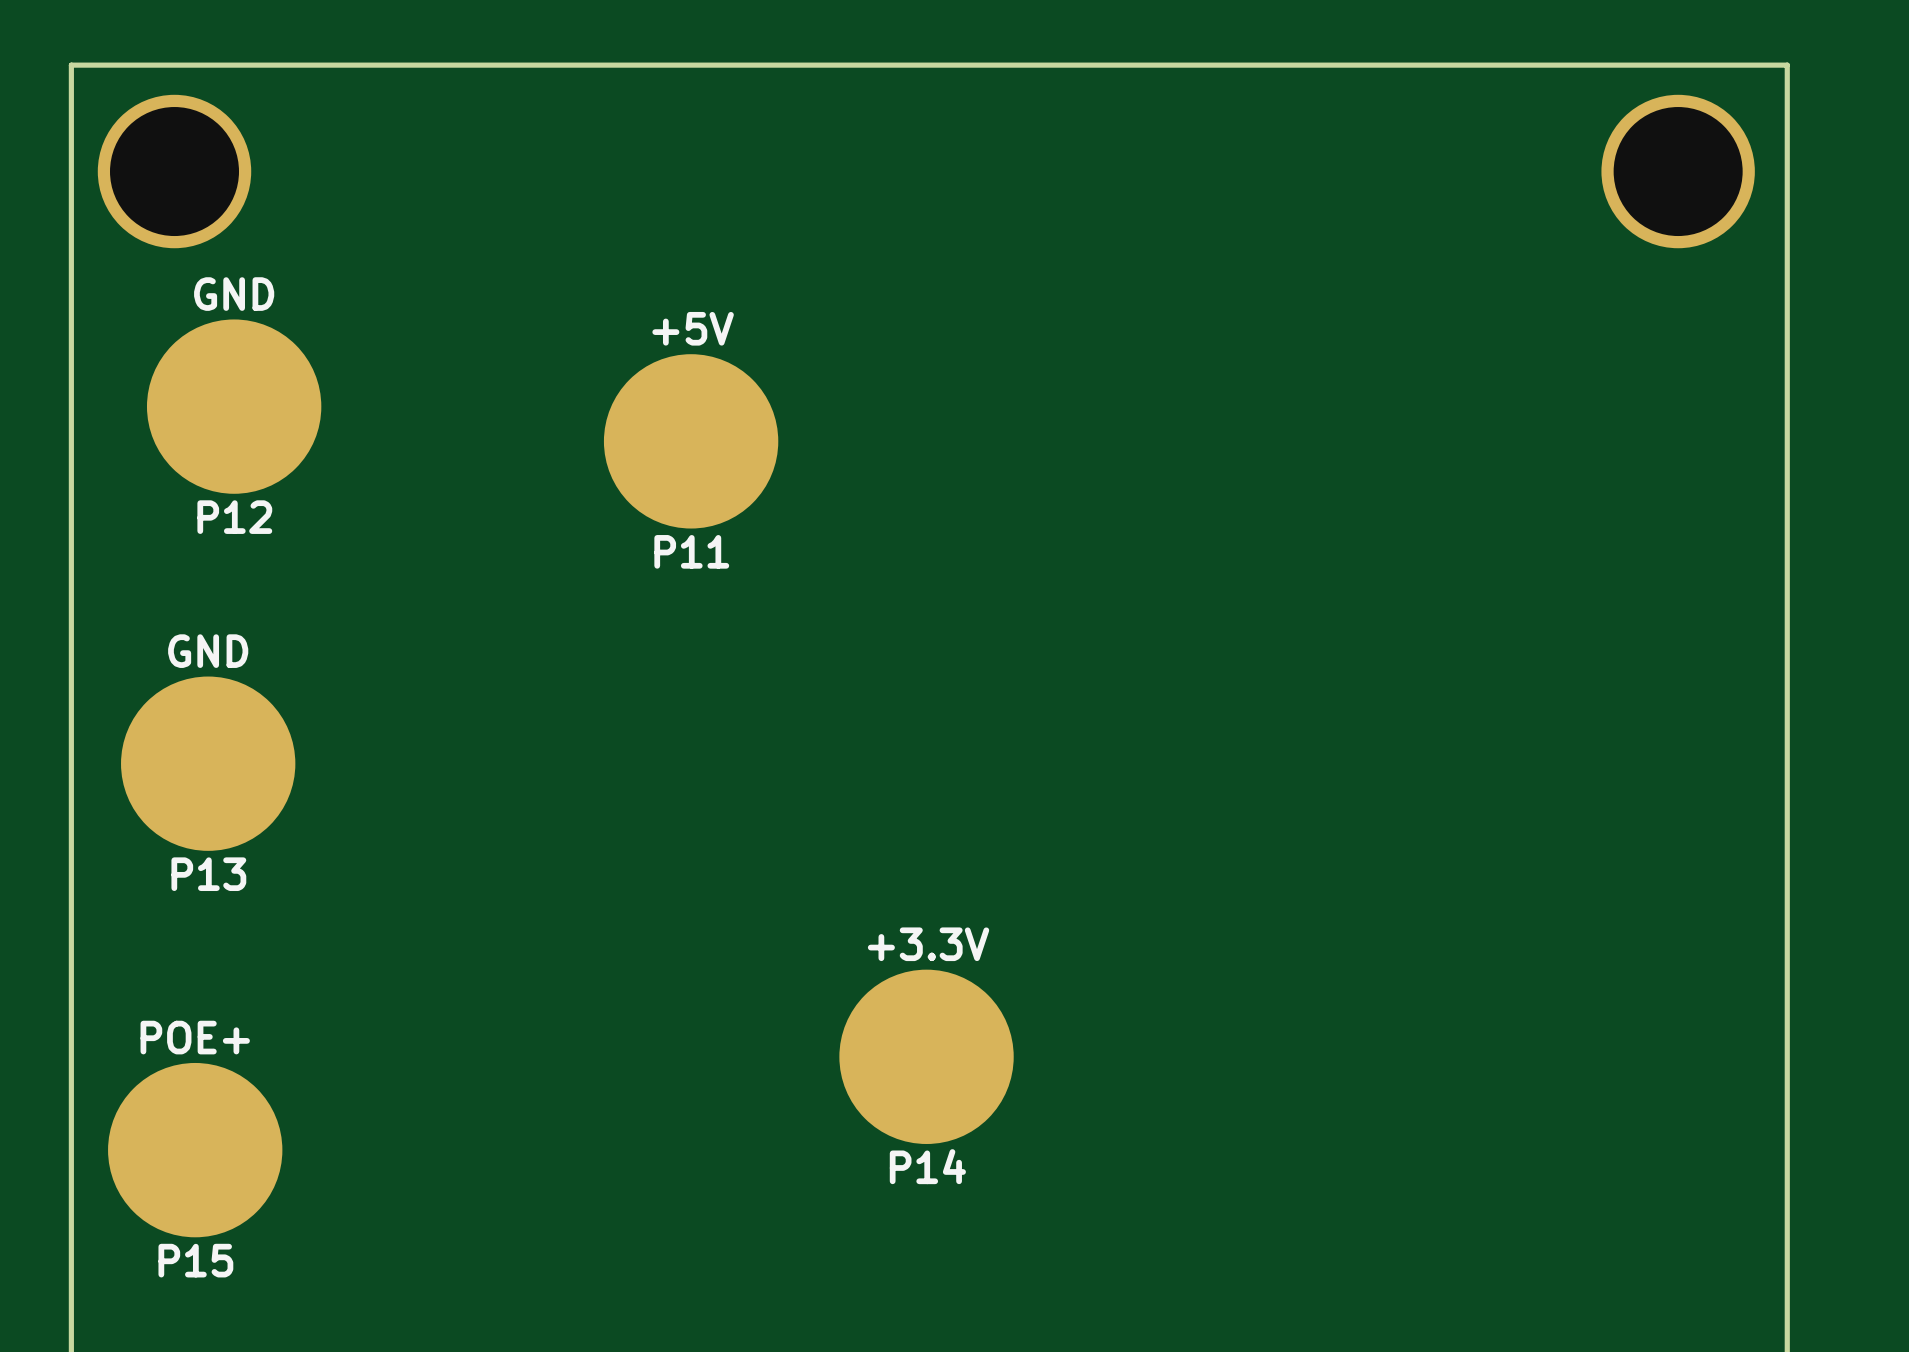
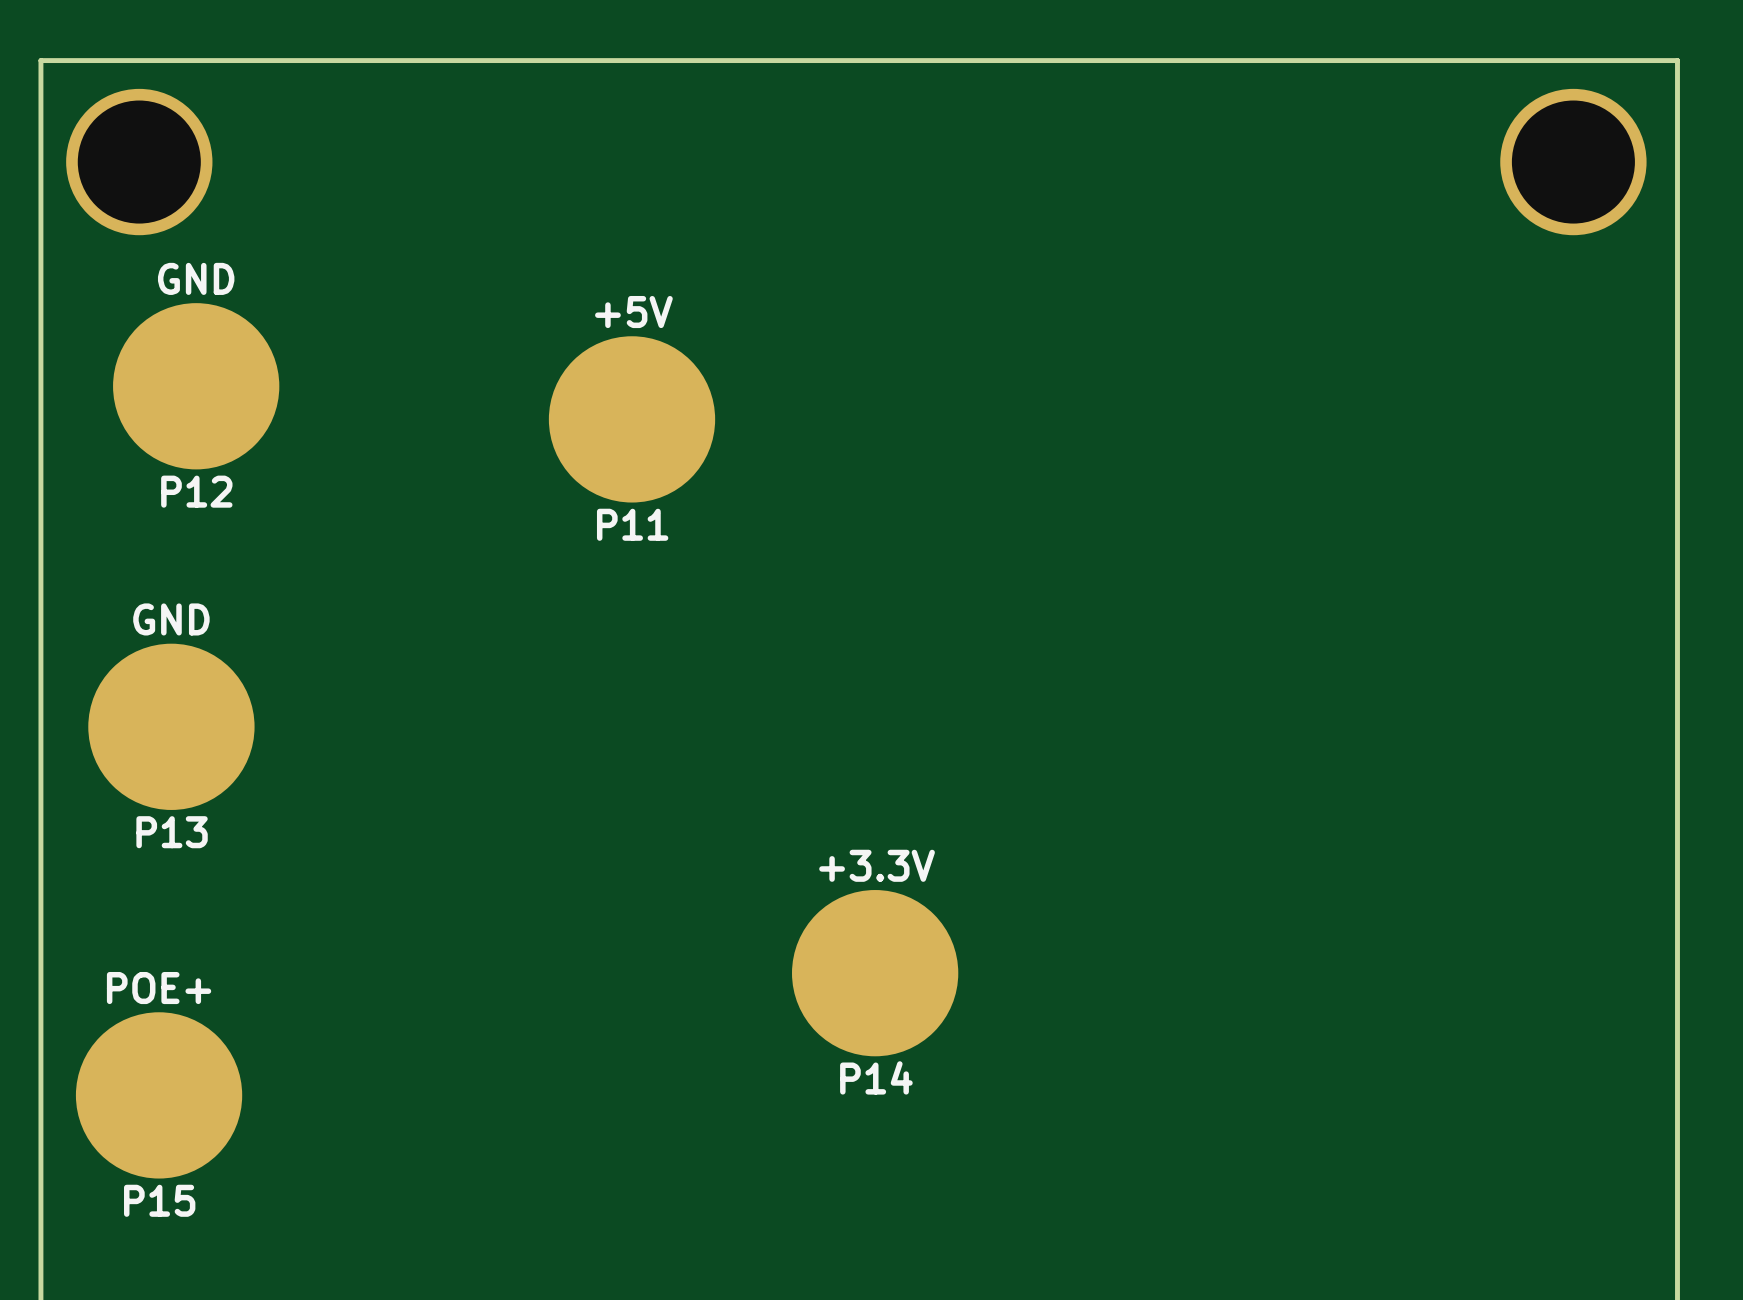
P14 position: (926, 1056) -> (875, 973)

